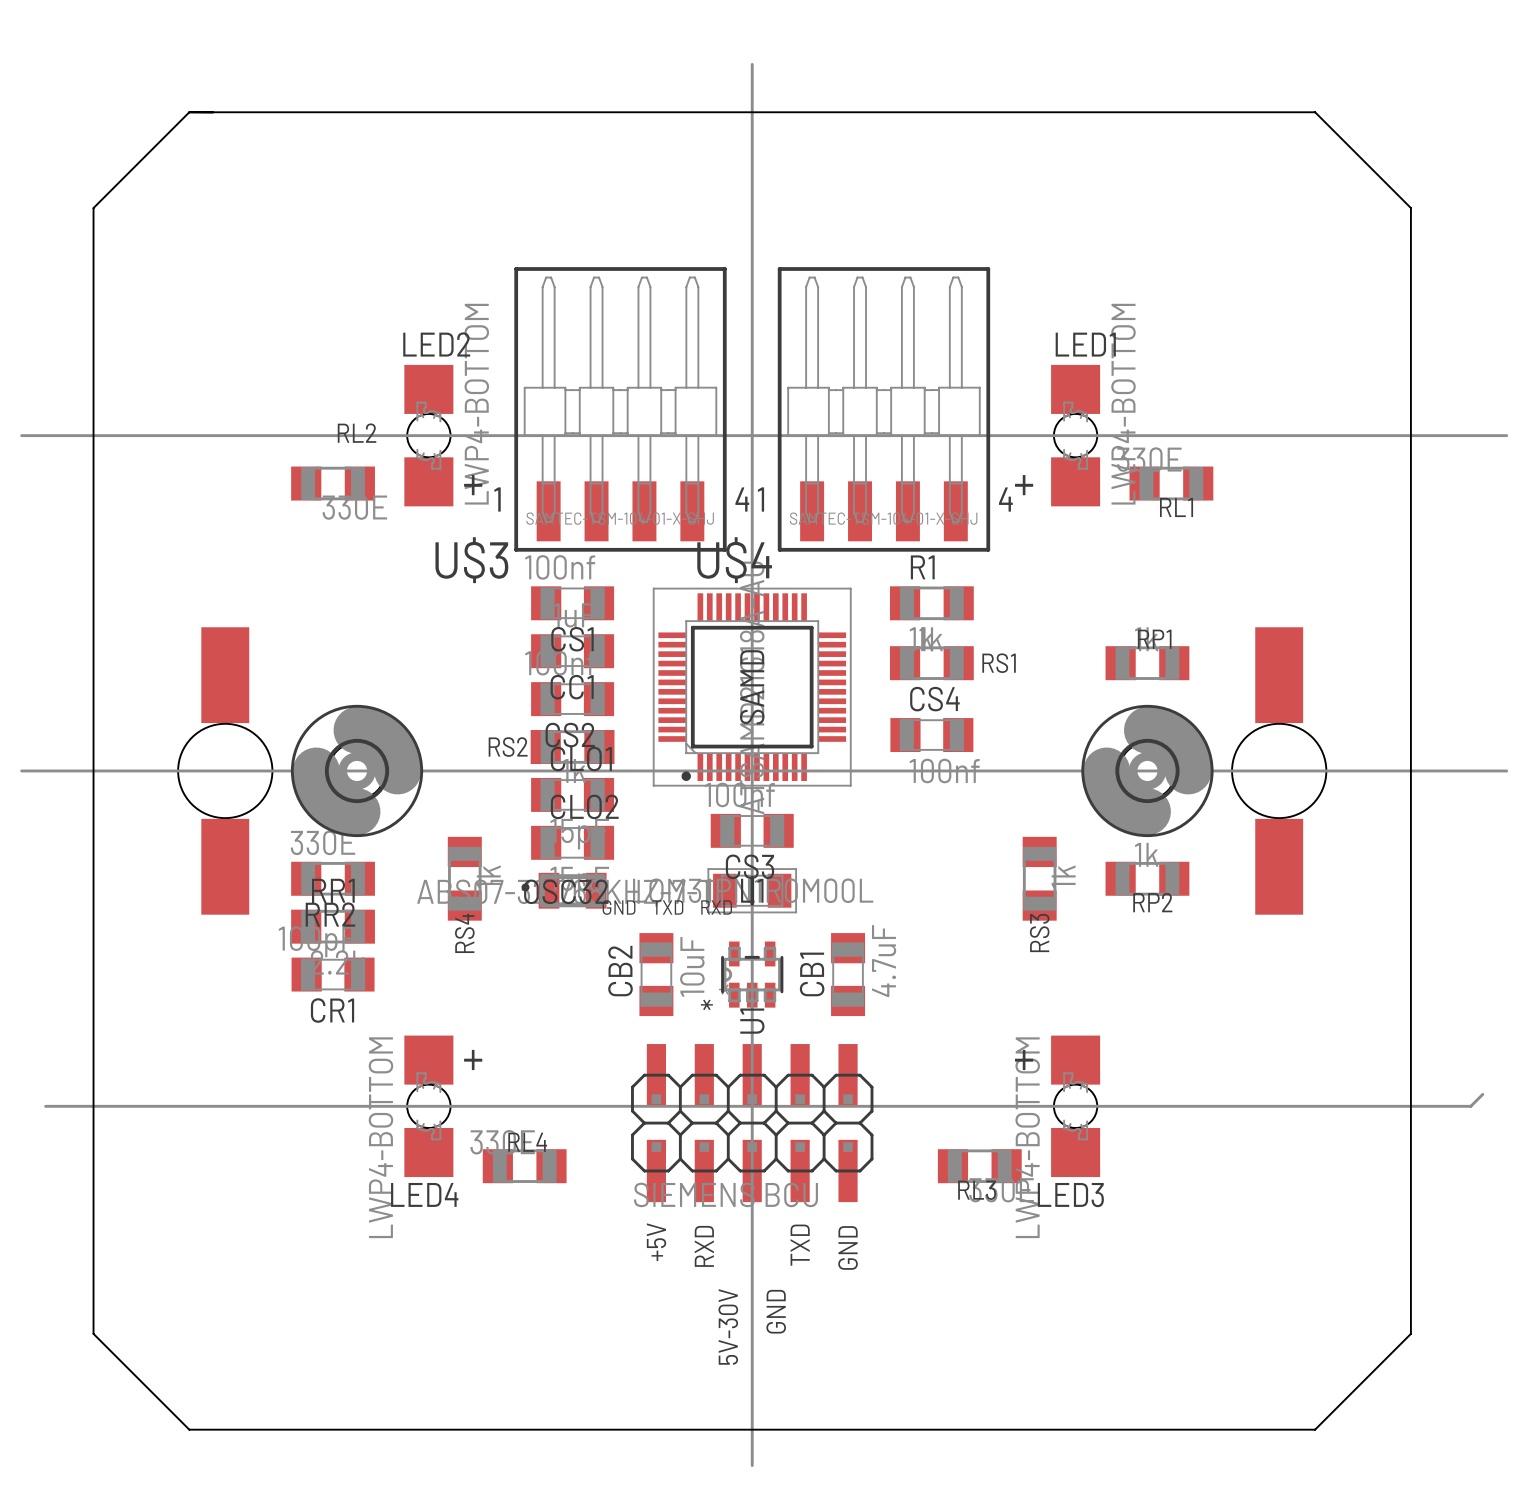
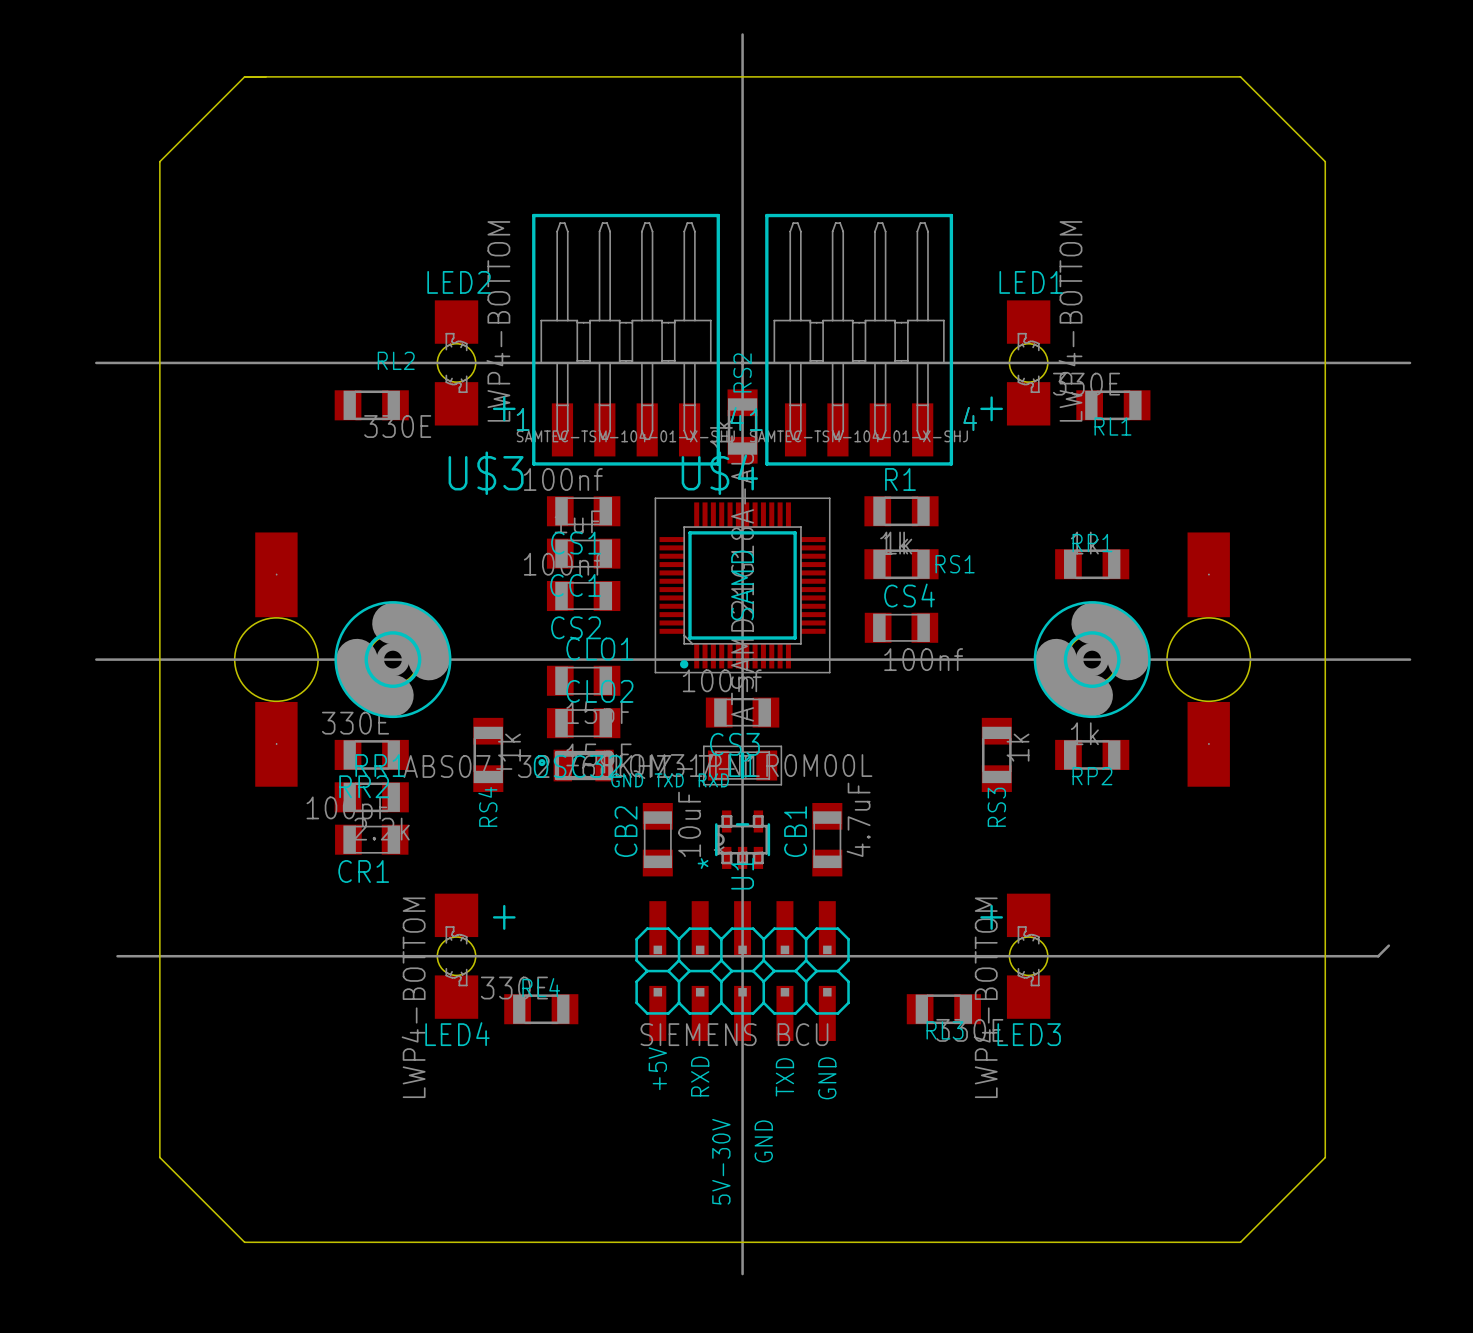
RS2 rotation: 0° (572, 747) -> 90° clockwise (742, 426)
RS2 position: (572, 747) -> (742, 426)

